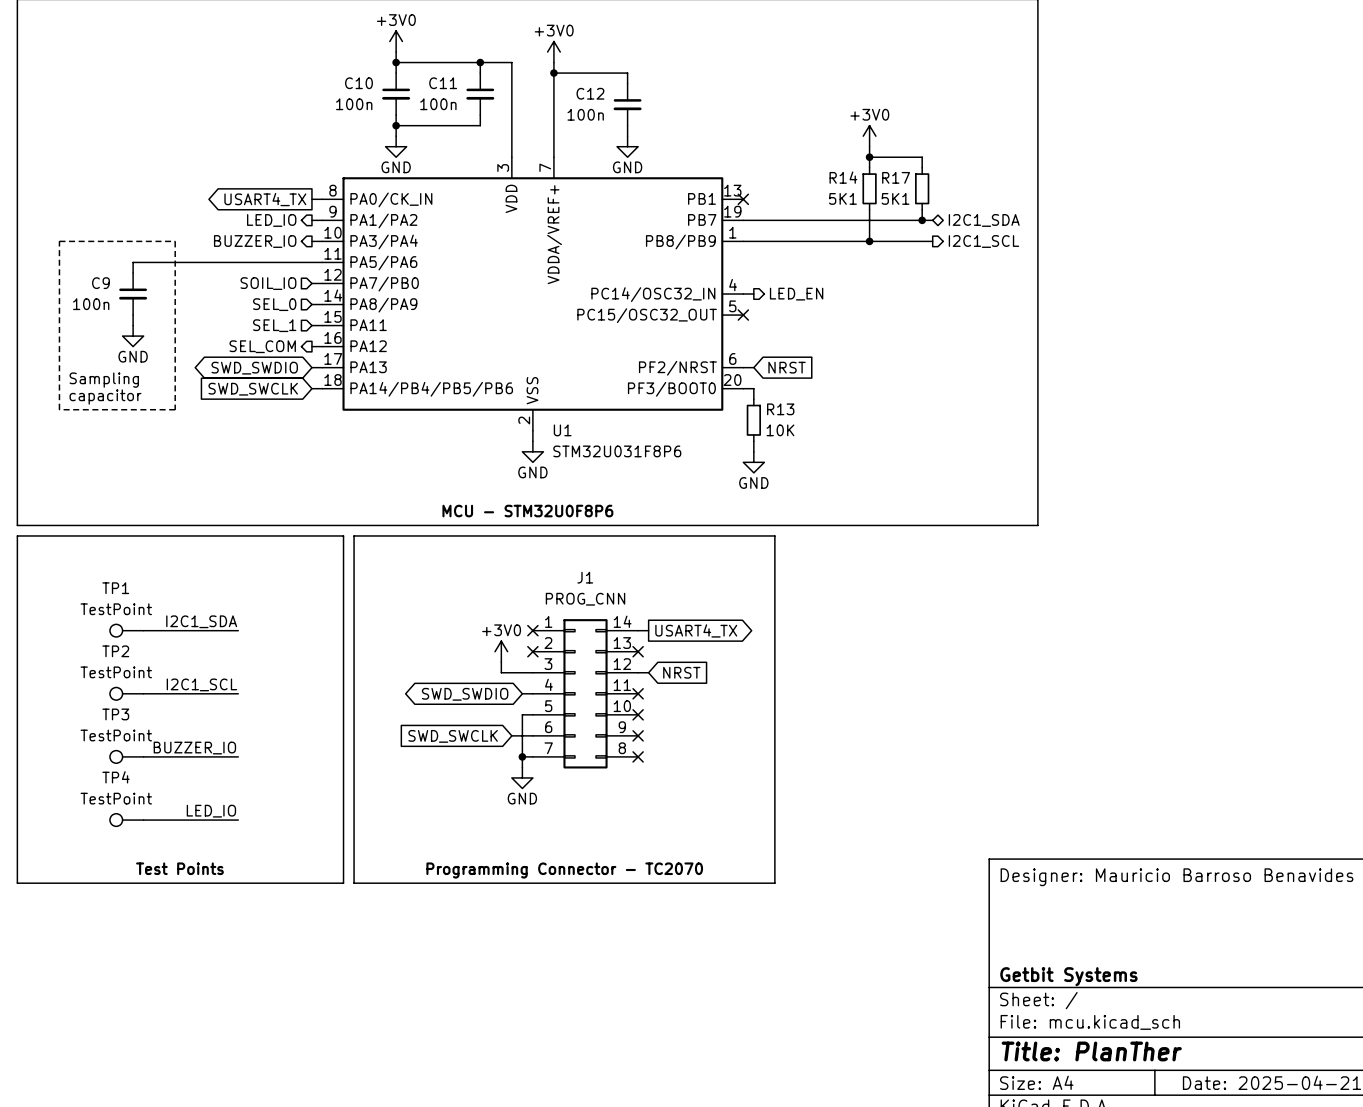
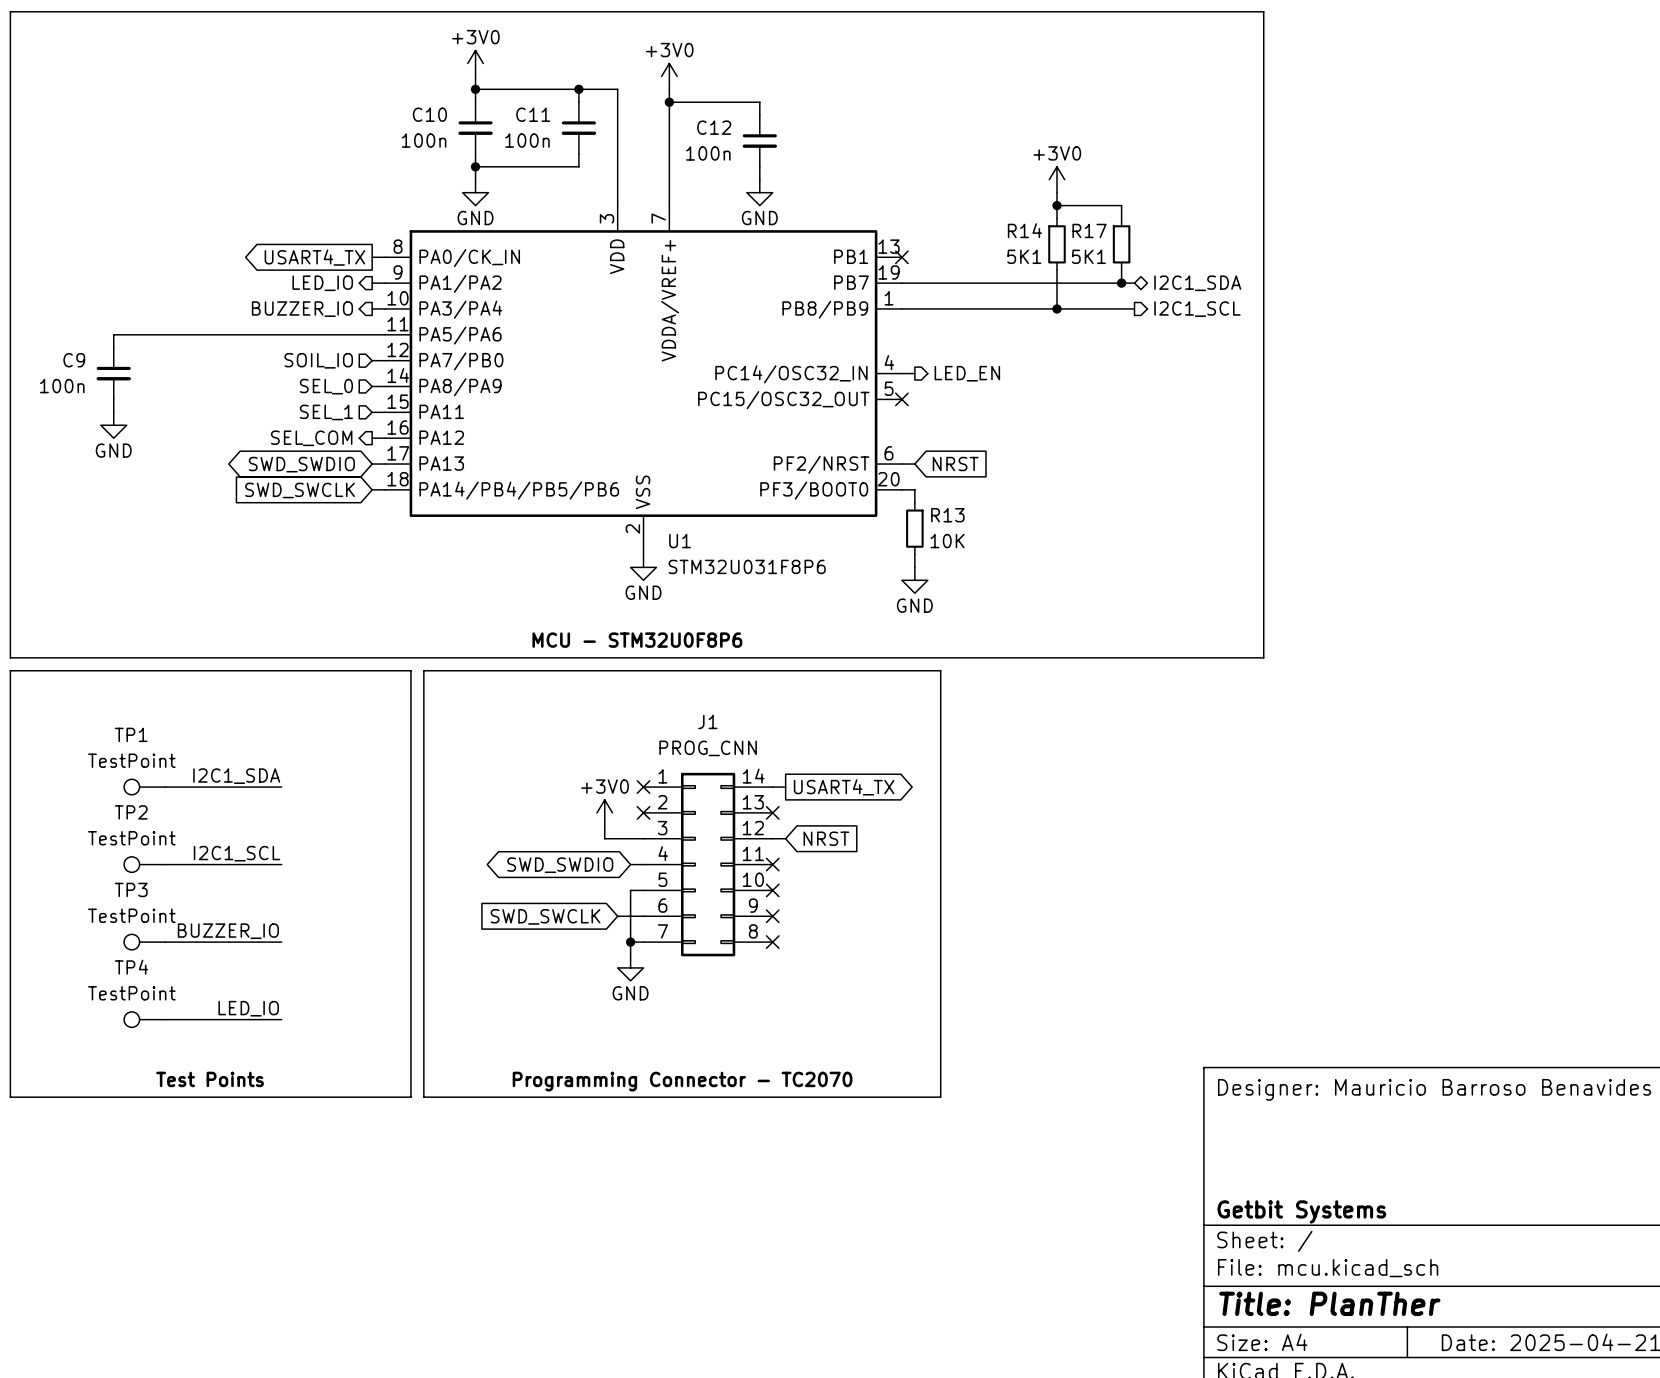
line: (59, 241) (175, 241) (175, 409) (59, 409) (59, 241) -> none
wire: (133, 262) (133, 272) -> (152, 334) (113, 334) (113, 347)
C9 position: (133, 294) -> (113, 373)
wire: (133, 315) (133, 325) -> (113, 399) (113, 412)
power symbol position: GND (133, 336) -> GND (113, 425)
text: Sampling (104, 380) -> none
text: capacitor (105, 397) -> none

